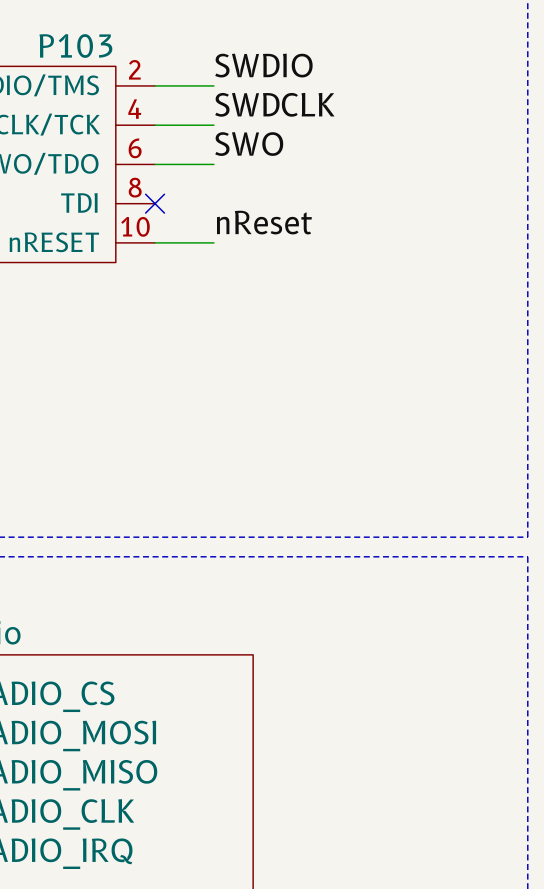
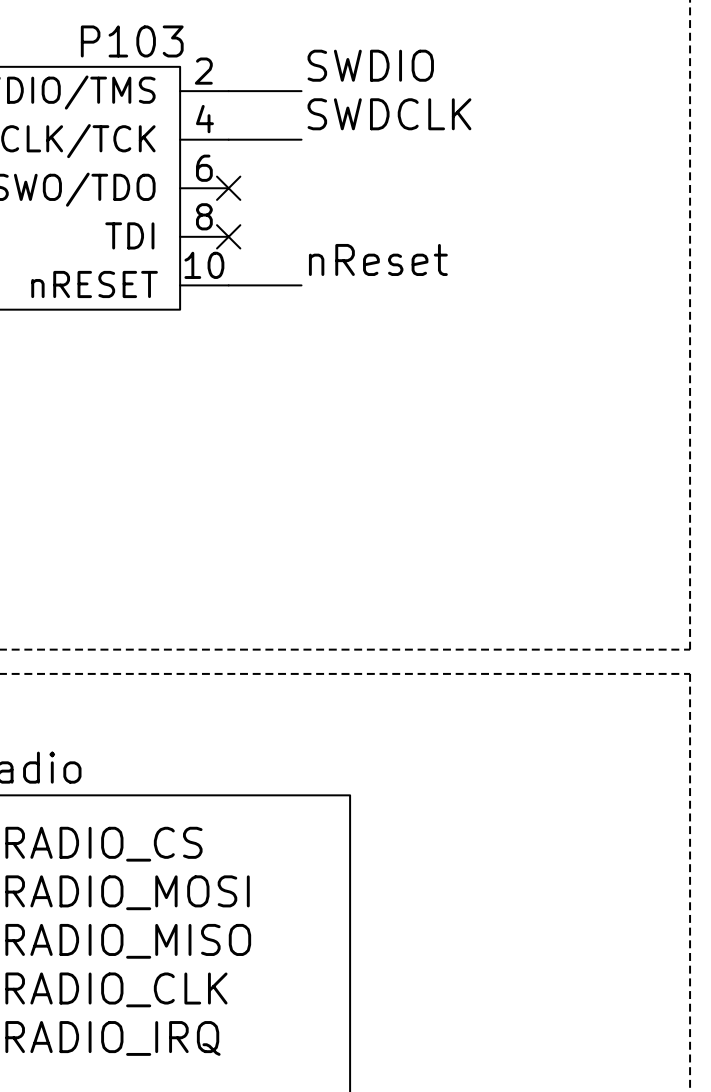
label: SWO (249, 144) -> none
wire: (155, 164) (213, 164) -> none
no-connect mark: none -> (228, 188)

